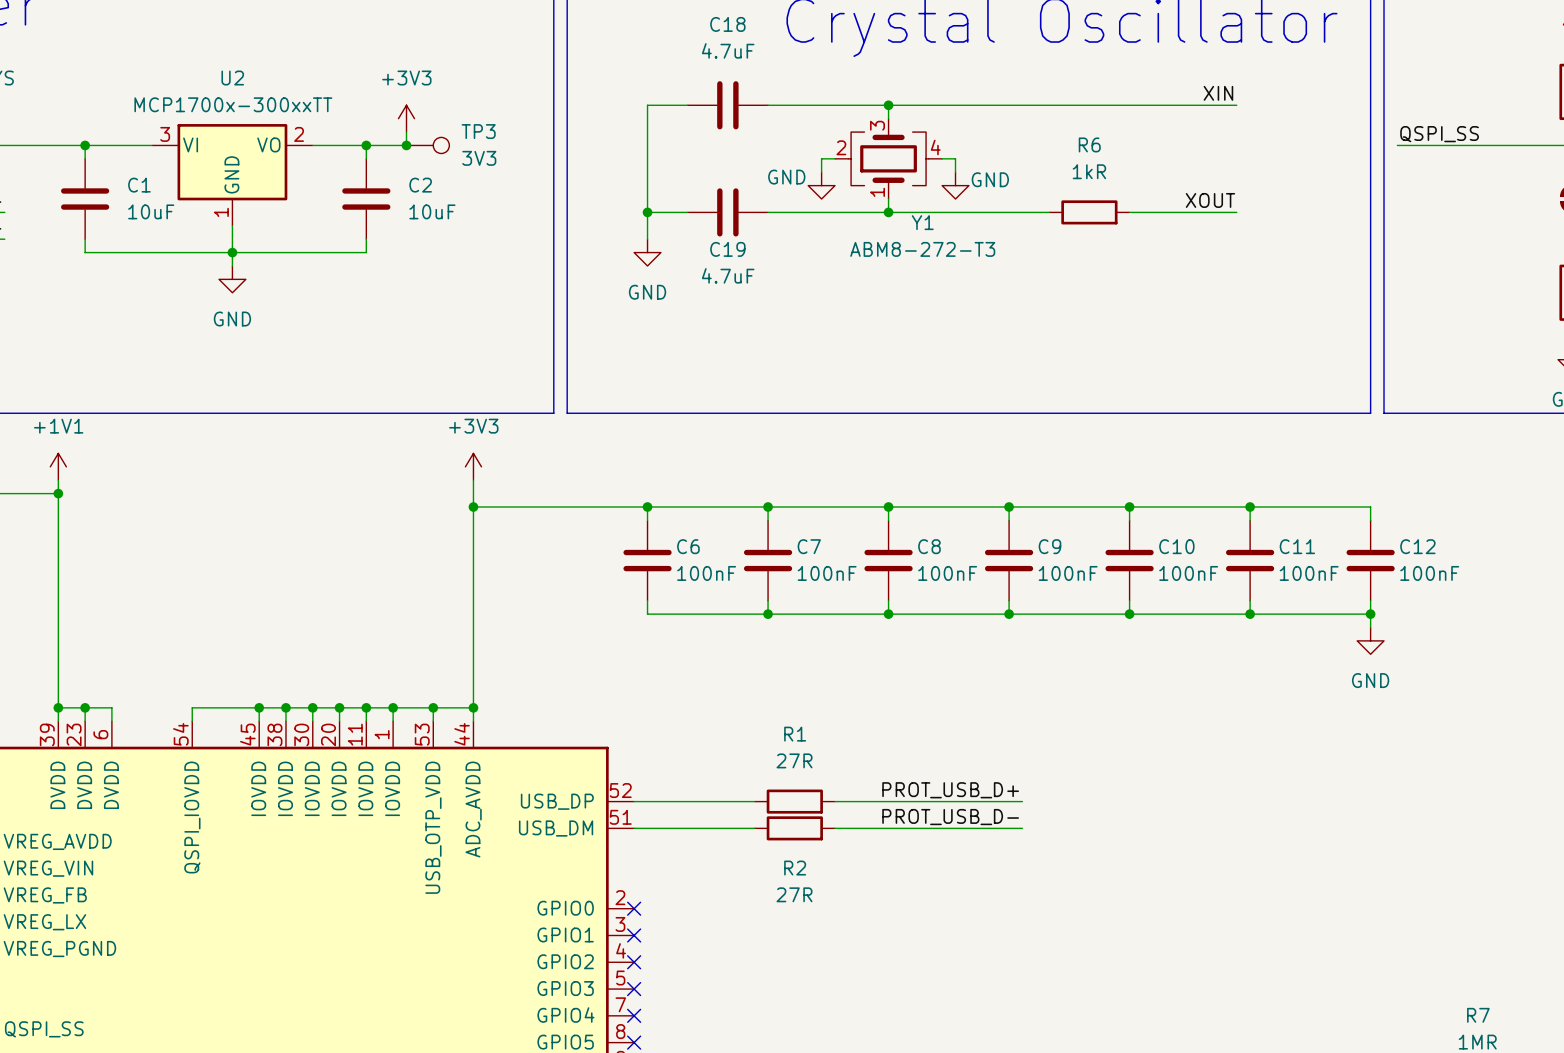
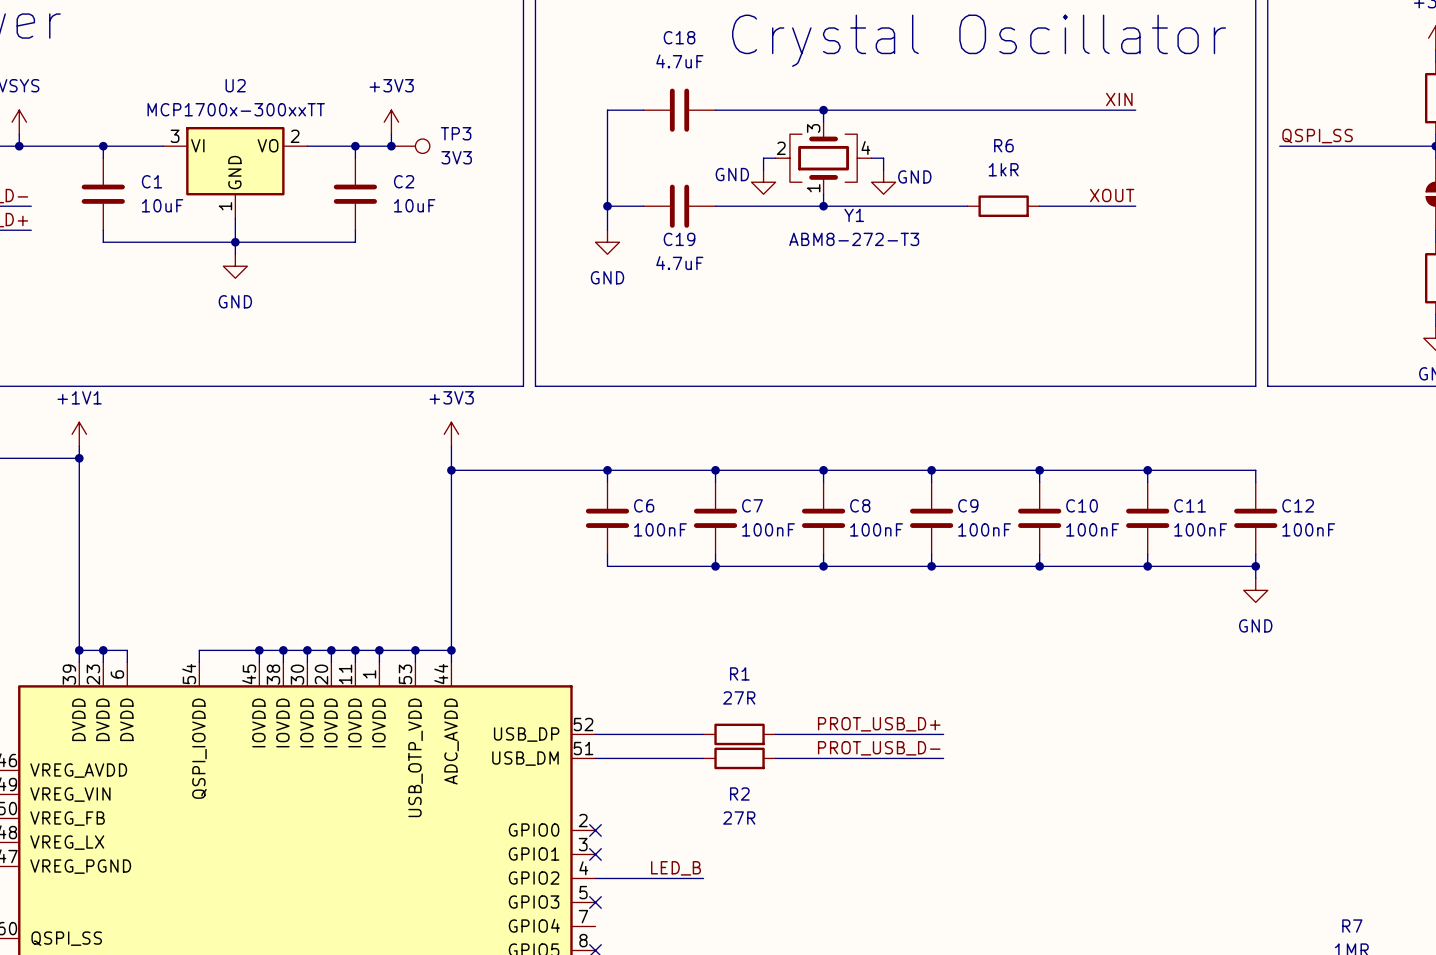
label: none -> LED_B (676, 868)
wire: none -> (595, 878) (703, 878)
no-connect mark: (634, 962) -> none
no-connect mark: (634, 1015) -> none

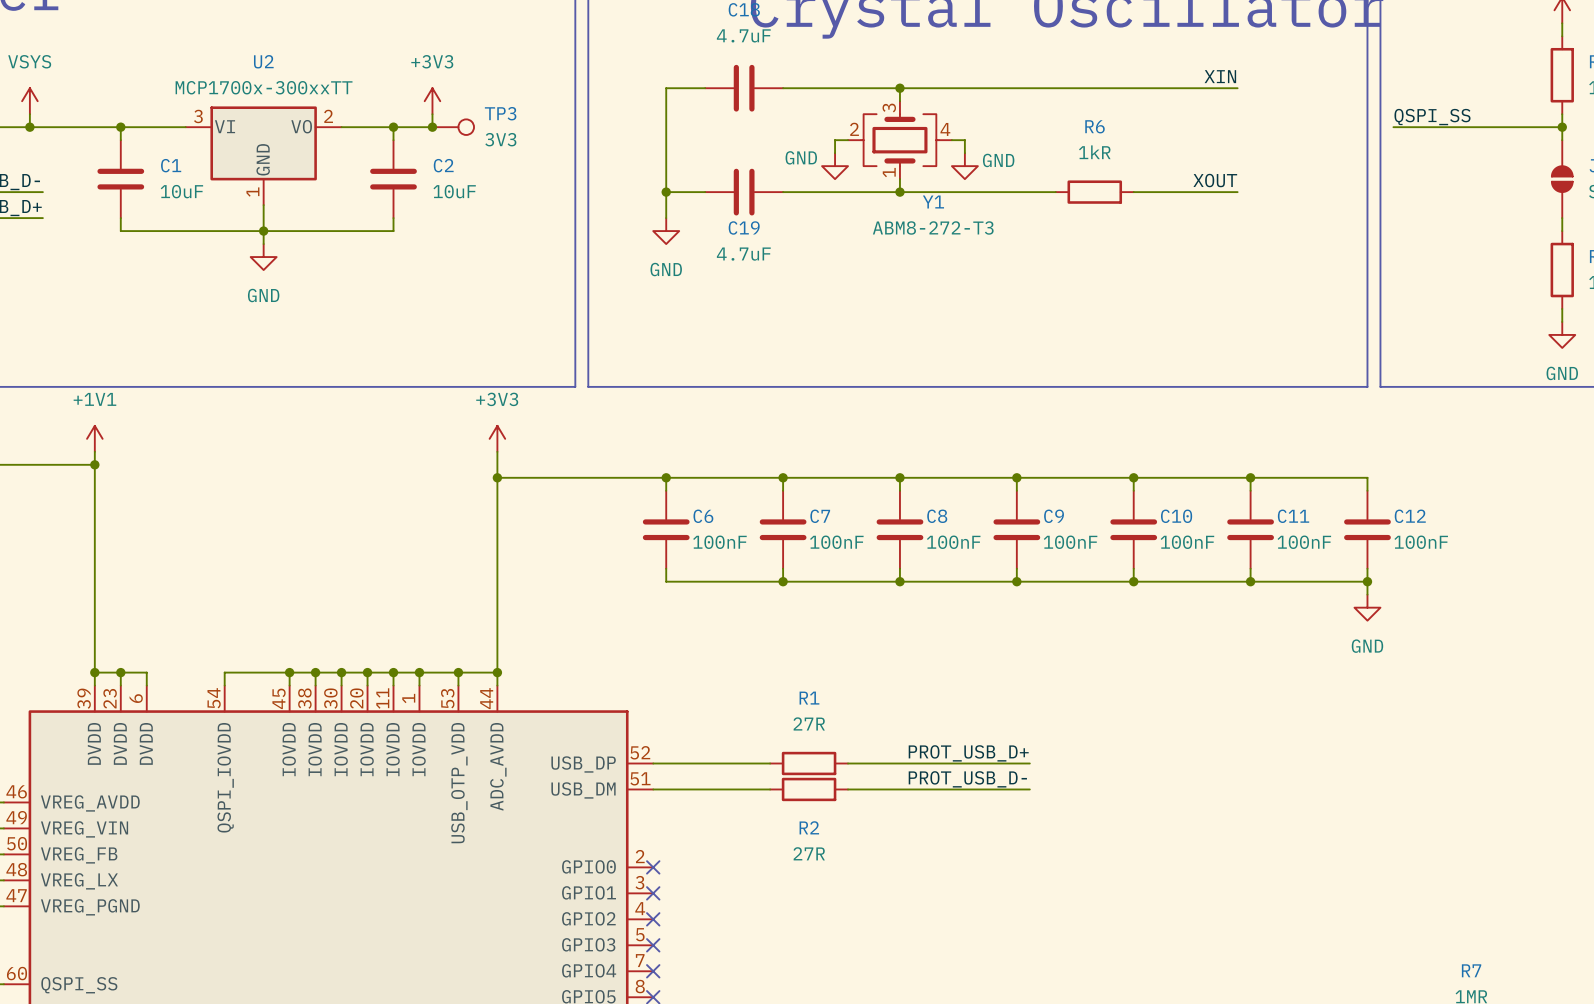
label: LED_B (676, 868) -> none
wire: (595, 878) (703, 878) -> none
no-connect mark: none -> (653, 919)
no-connect mark: none -> (653, 971)

